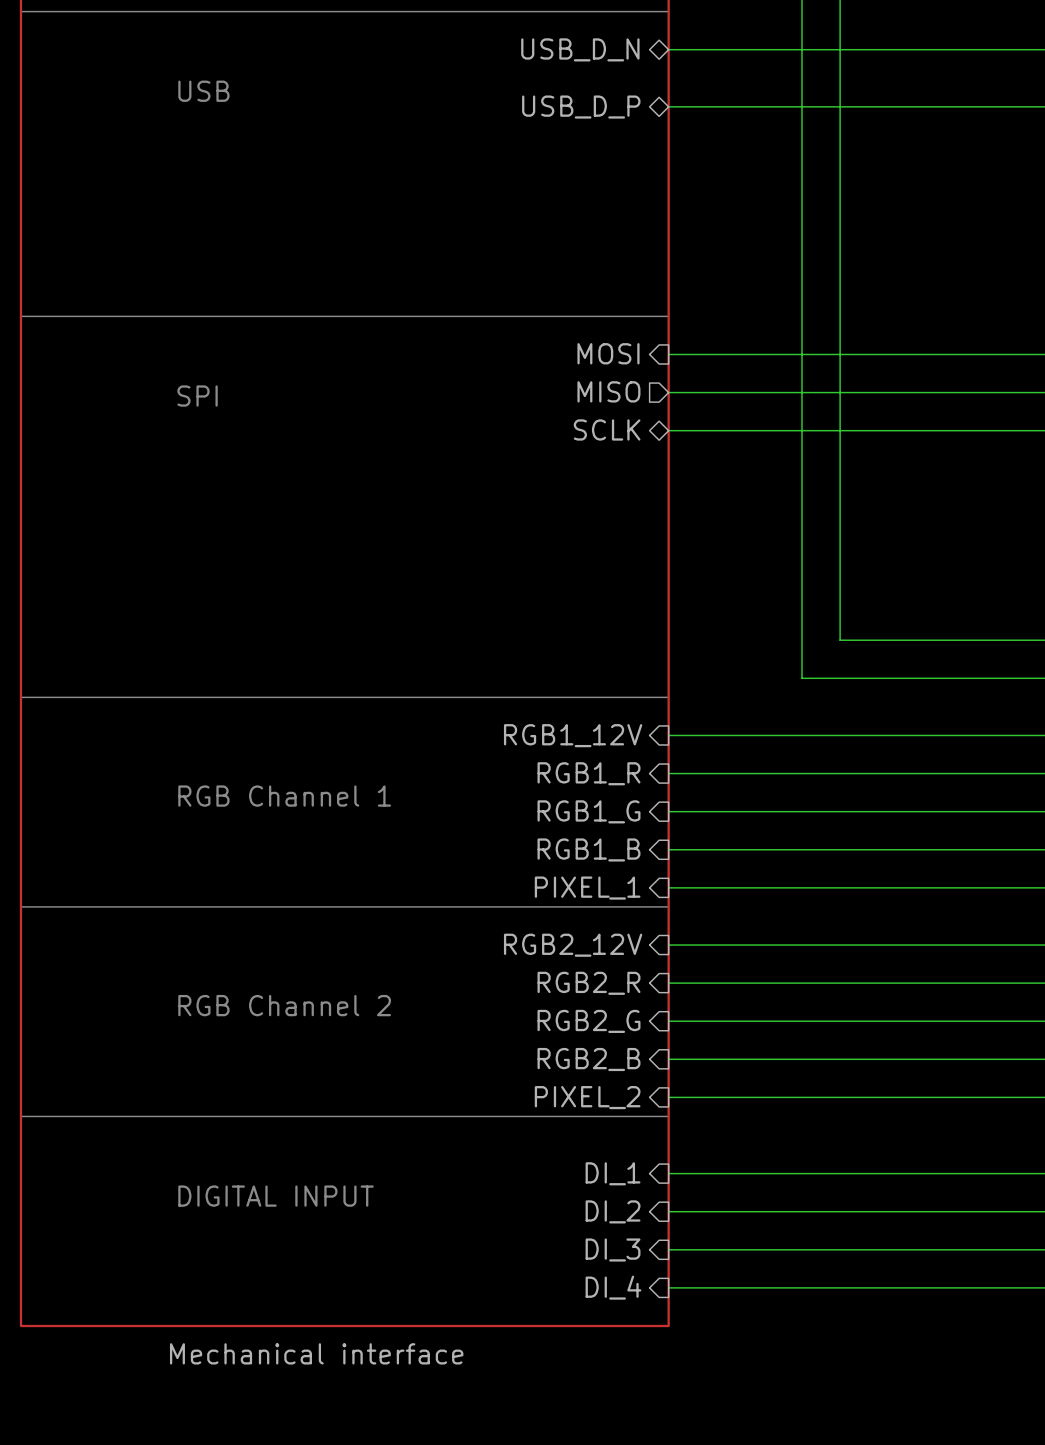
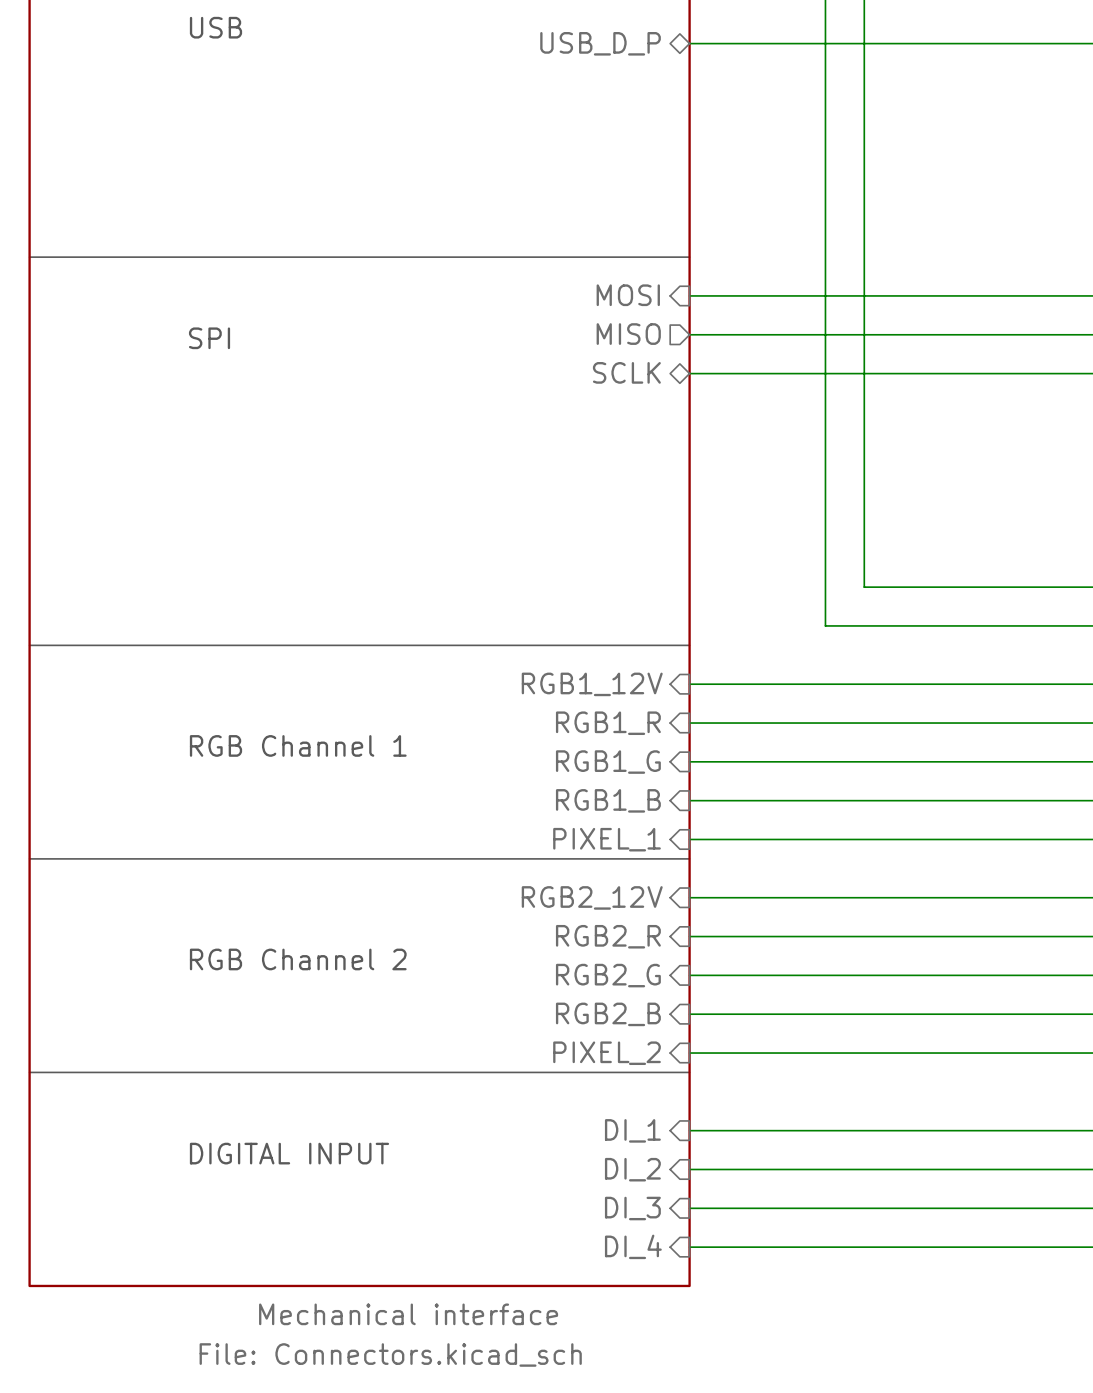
sheet text position: Mechanical interface (316, 1353) -> Mechanical interface (408, 1314)
sheet value: none -> File: Connectors.kicad_sch (390, 1354)

